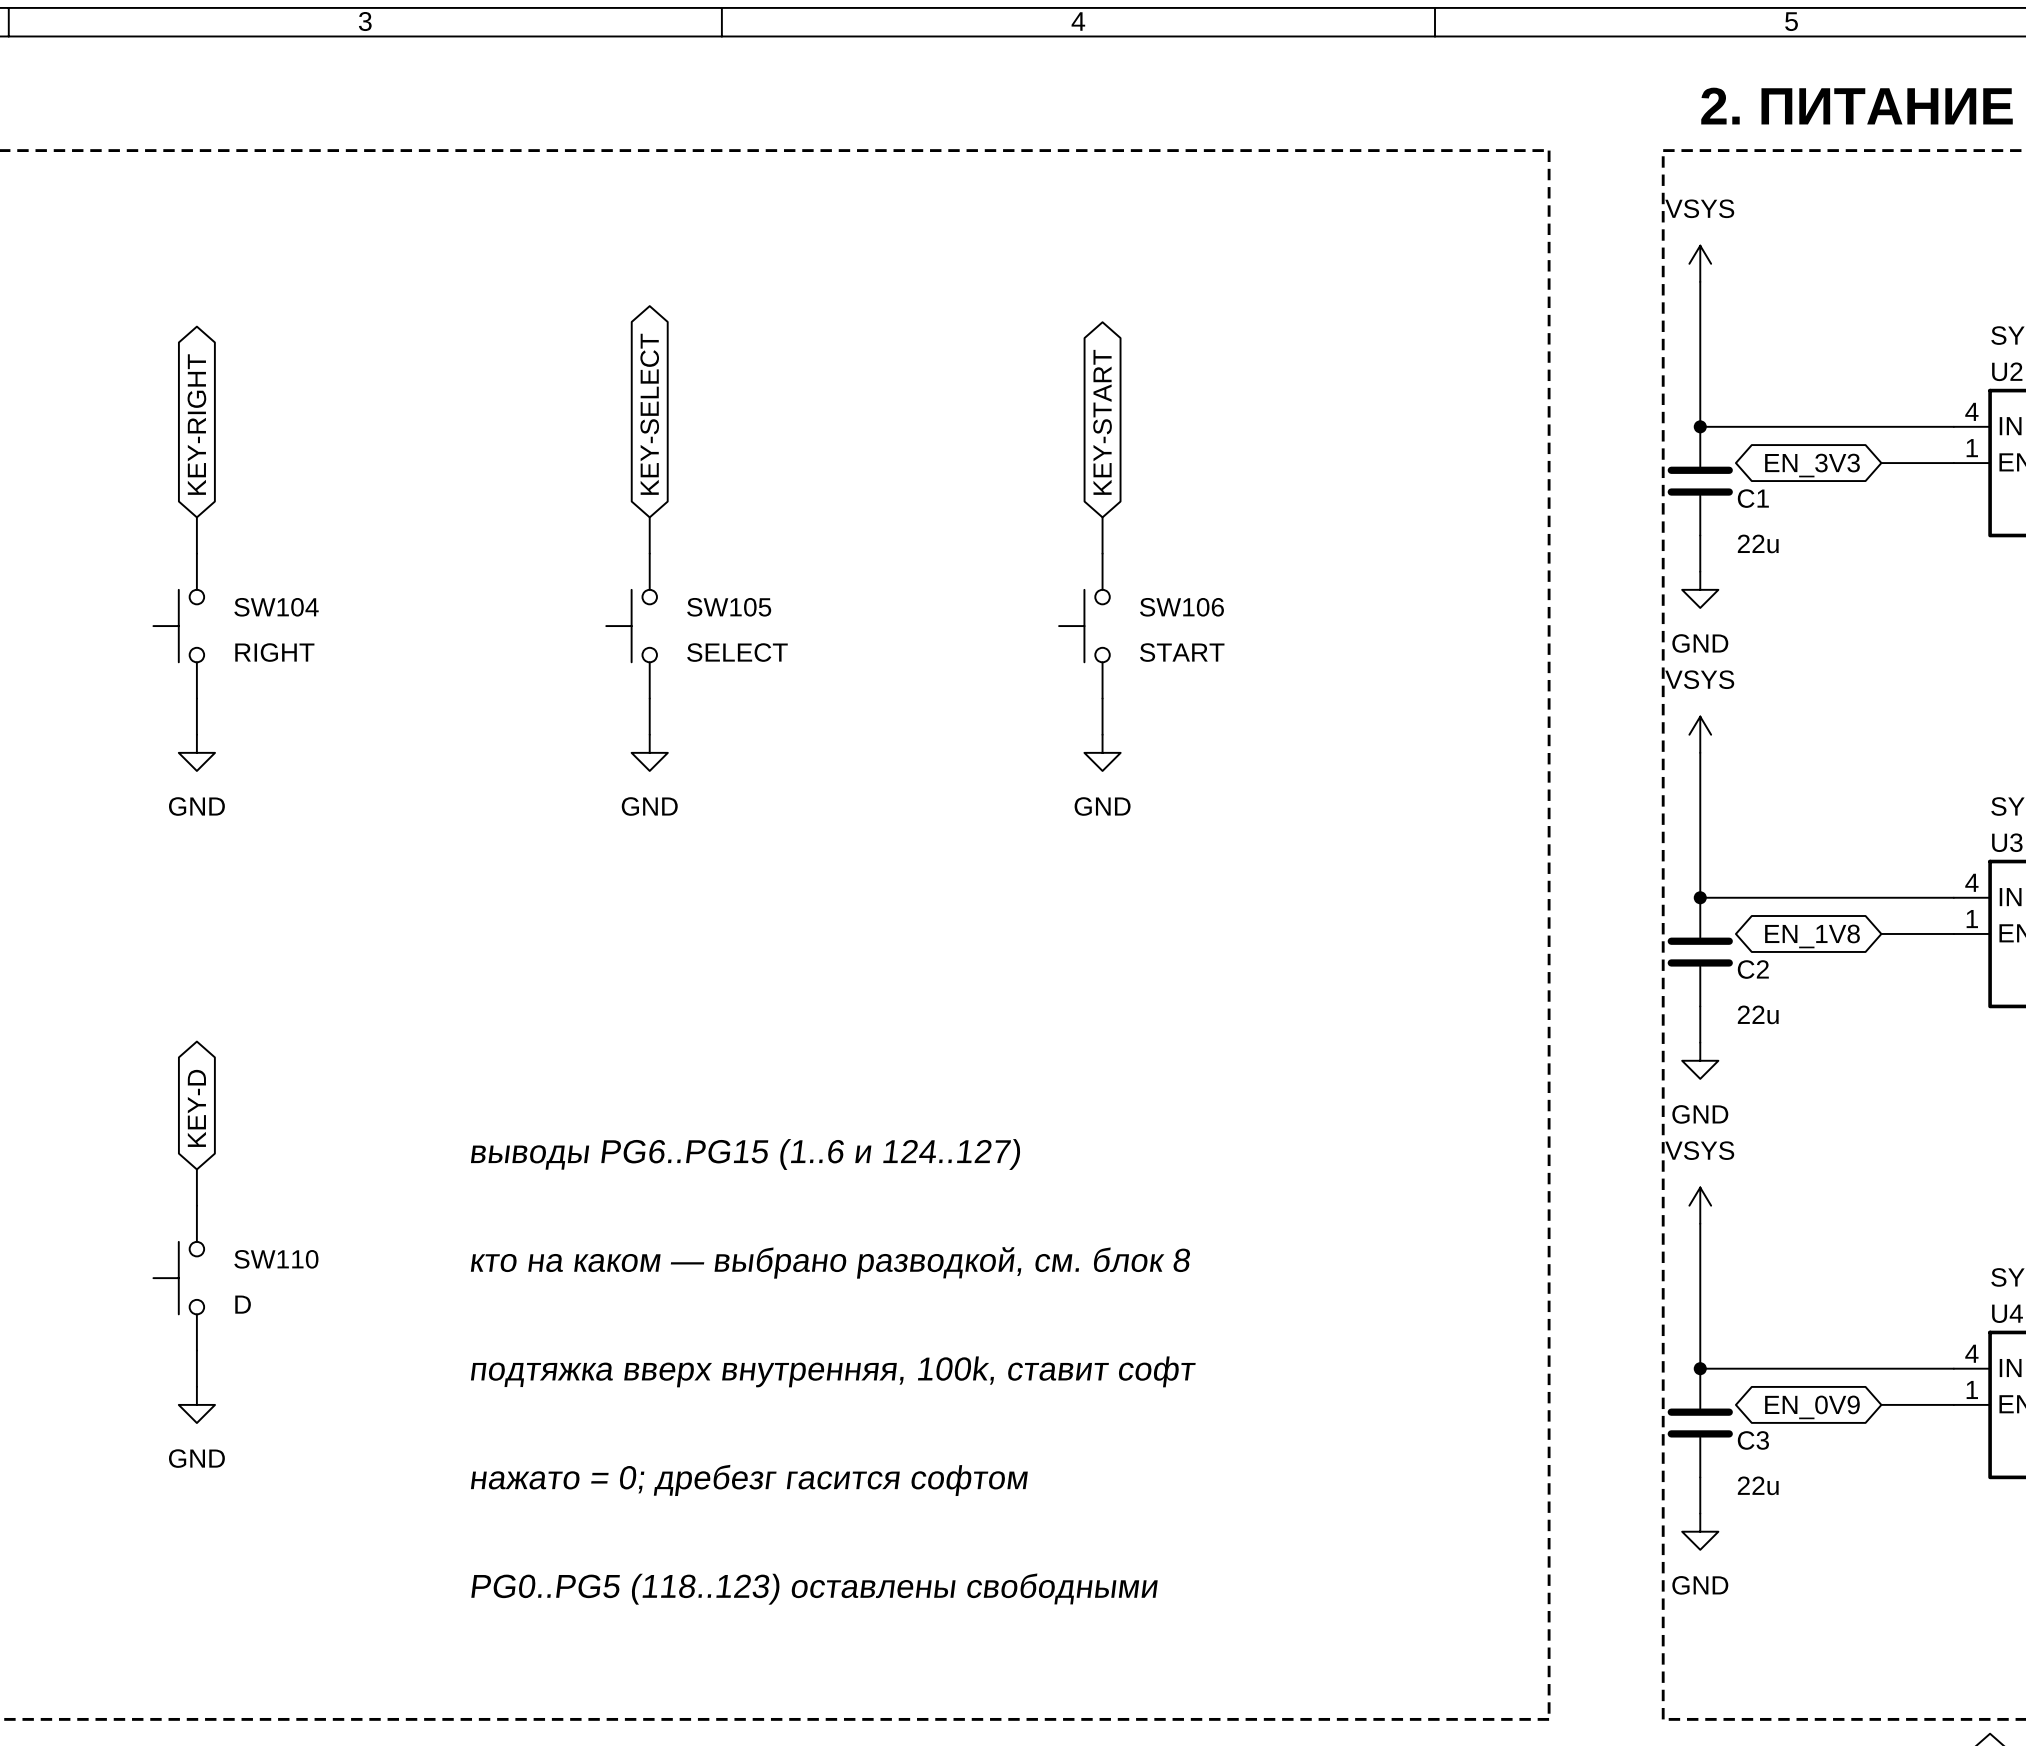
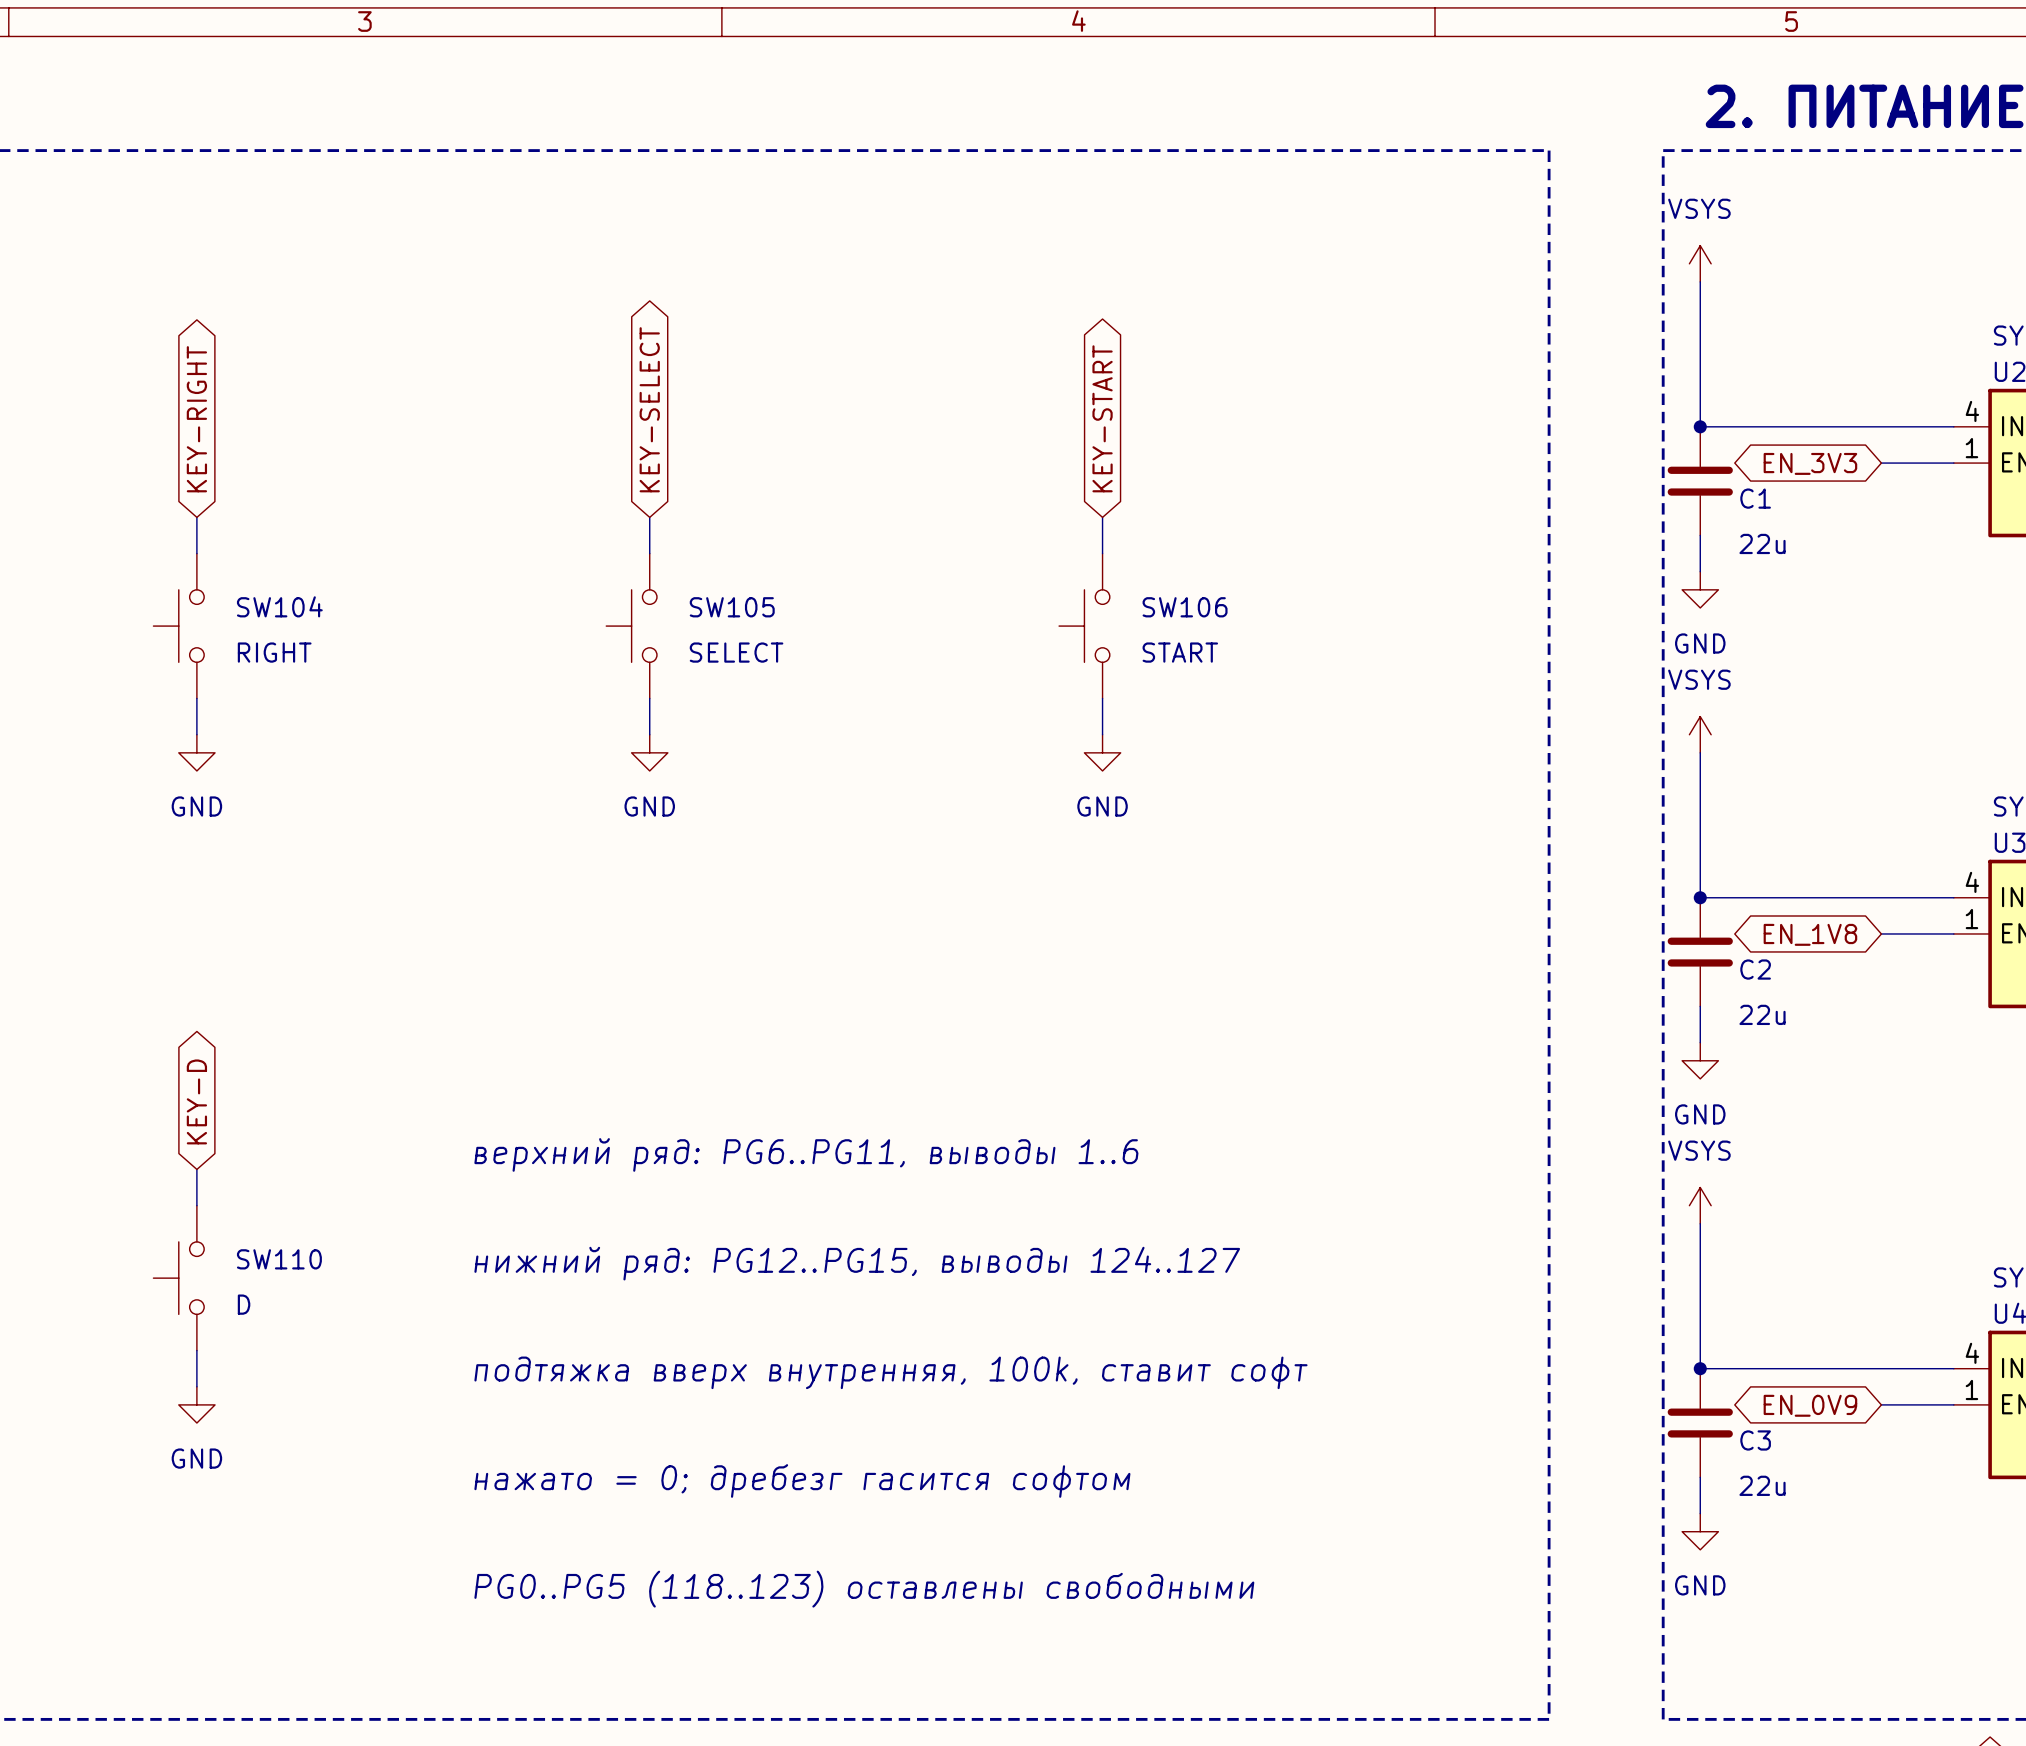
text: выводы PG6..PG15 (1..6 и 124..127) (745, 1154) -> верхний ряд: PG6..PG11, выводы 1..6 (806, 1154)
text: кто на каком — выбрано разводкой, см. блок 8 (830, 1262) -> нижний ряд: PG12..PG15, выводы 124..127 (857, 1263)

